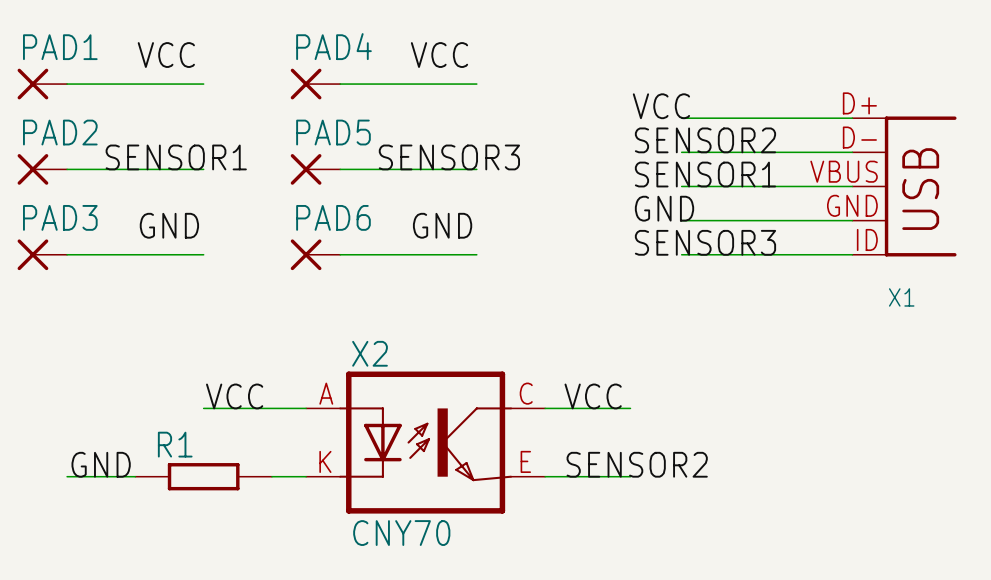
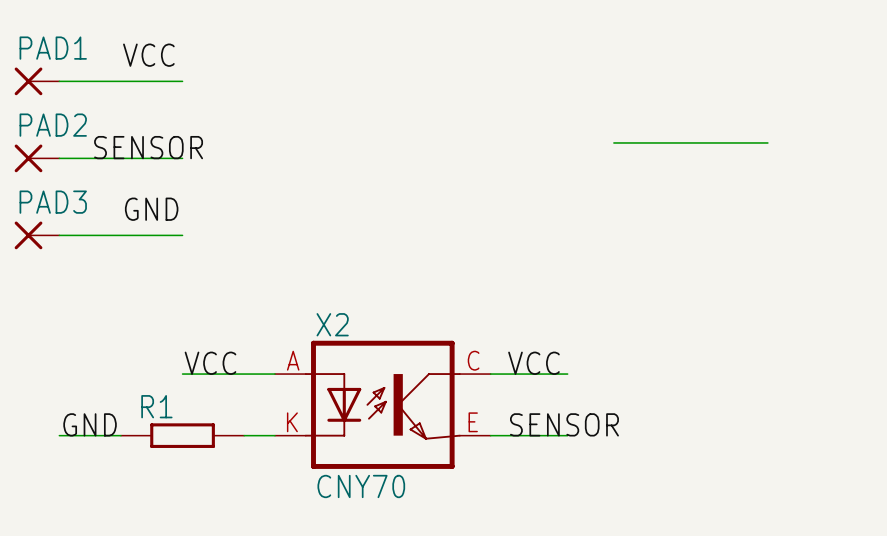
label: VCC (439, 55) -> none
PAD4: (315, 84) -> none
wire: (340, 84) (476, 84) -> none
label: VCC (661, 106) -> none
wire: (681, 118) (852, 118) -> none
label: SENSOR2 (705, 140) -> none
label: SENSOR1 (176, 157) -> SENSOR (148, 147)
label: SENSOR3 (449, 157) -> none
PAD5: (315, 169) -> none
wire: (340, 169) (476, 169) -> none
label: SENSOR1 (705, 174) -> none
wire: (681, 186) (852, 186) -> none
X1: (904, 186) -> none
label: GND (664, 208) -> none
wire: (681, 220) (852, 220) -> none
label: GND (442, 225) -> none
label: SENSOR3 (705, 242) -> none
PAD6: (315, 254) -> none
wire: (340, 254) (476, 254) -> none
wire: (681, 254) (852, 254) -> none
label: SENSOR2 (637, 464) -> SENSOR (564, 424)

